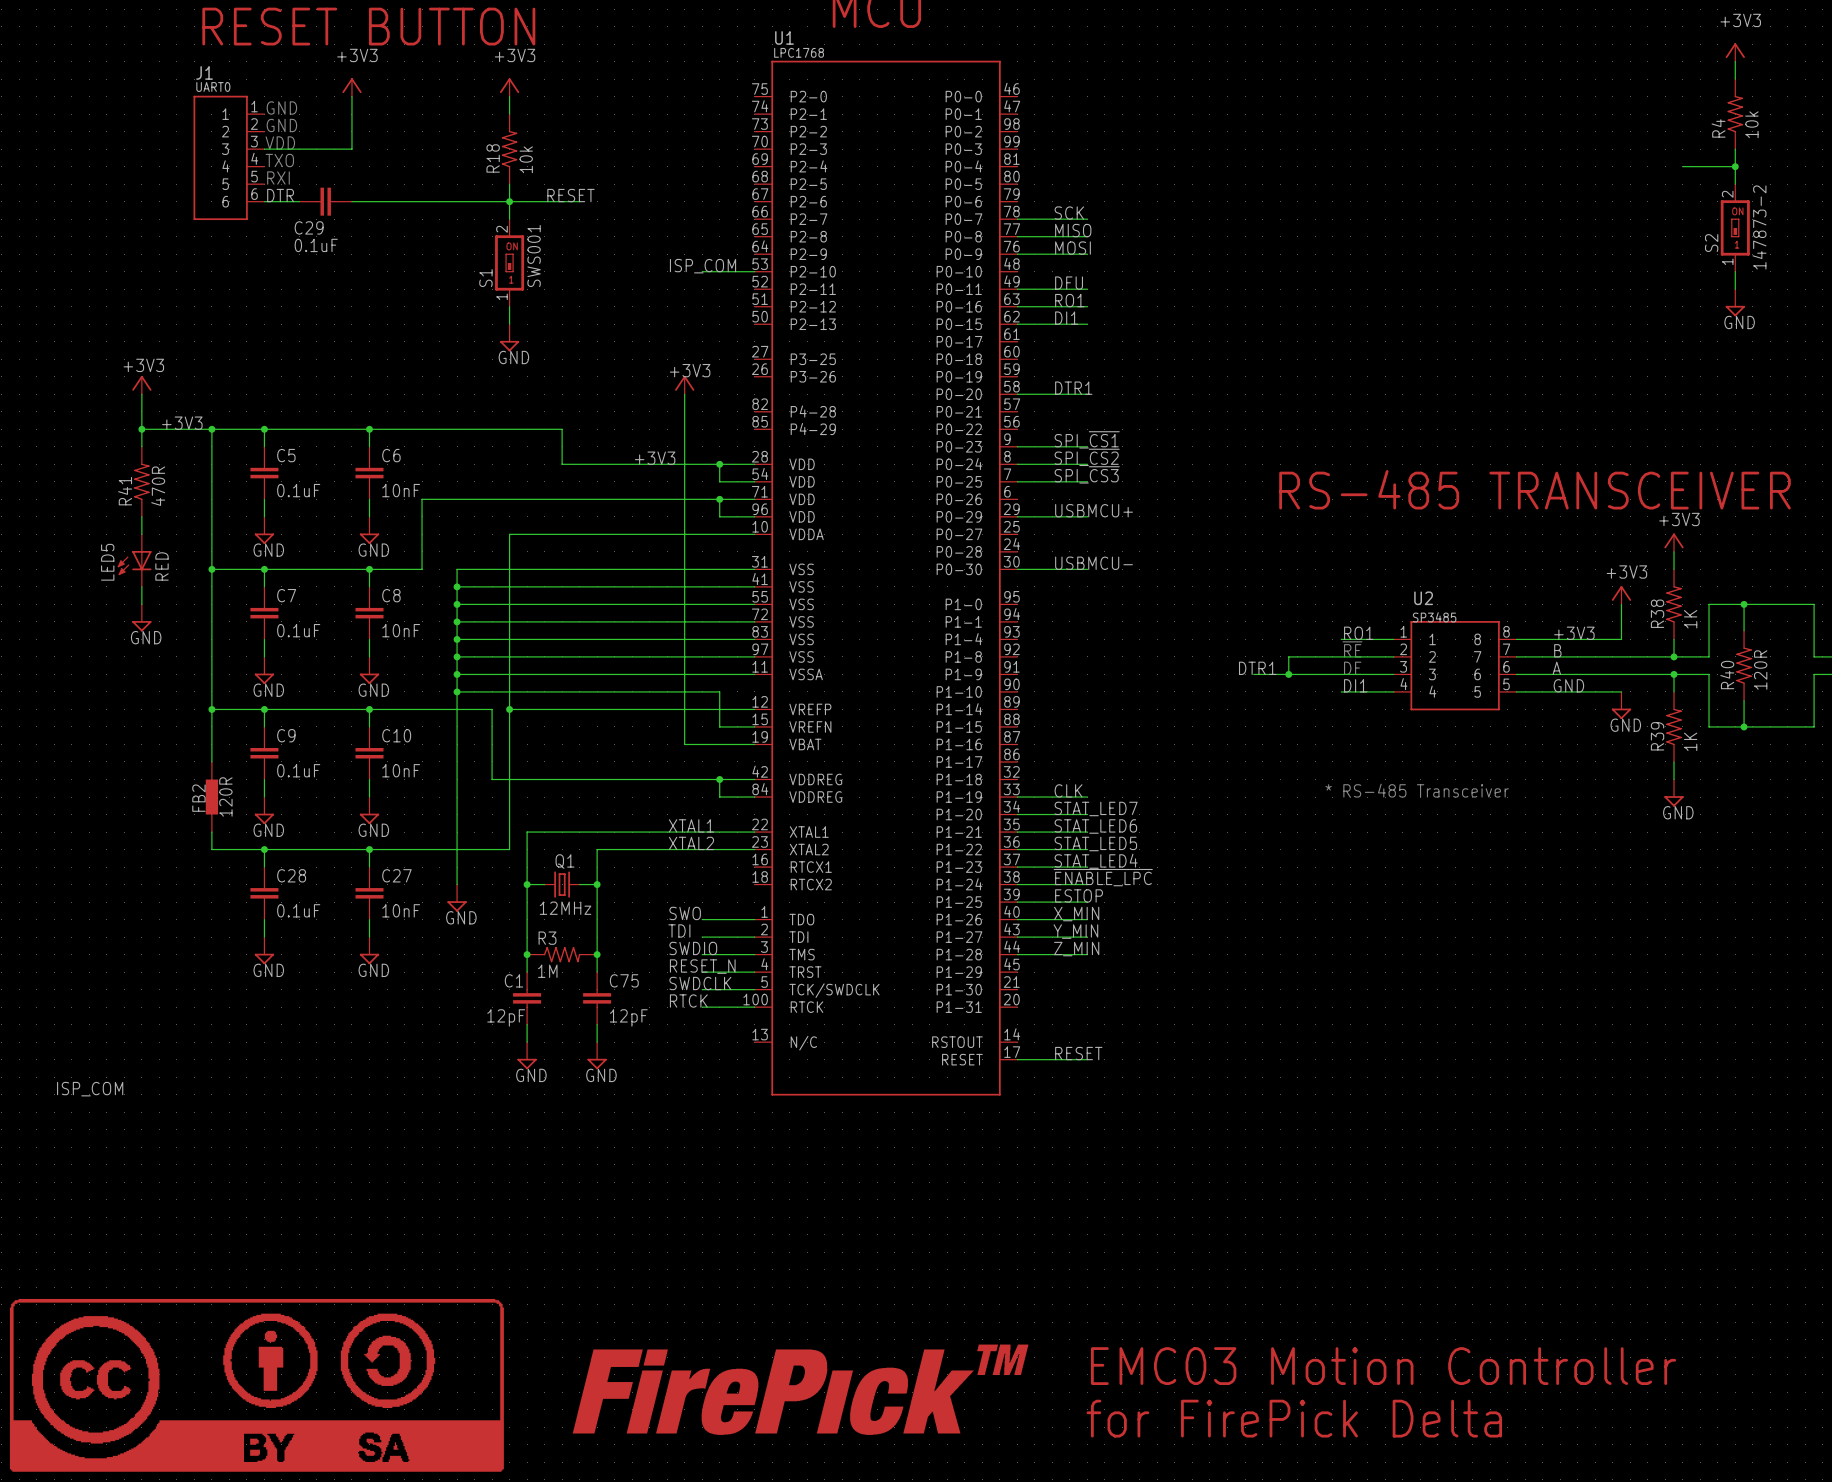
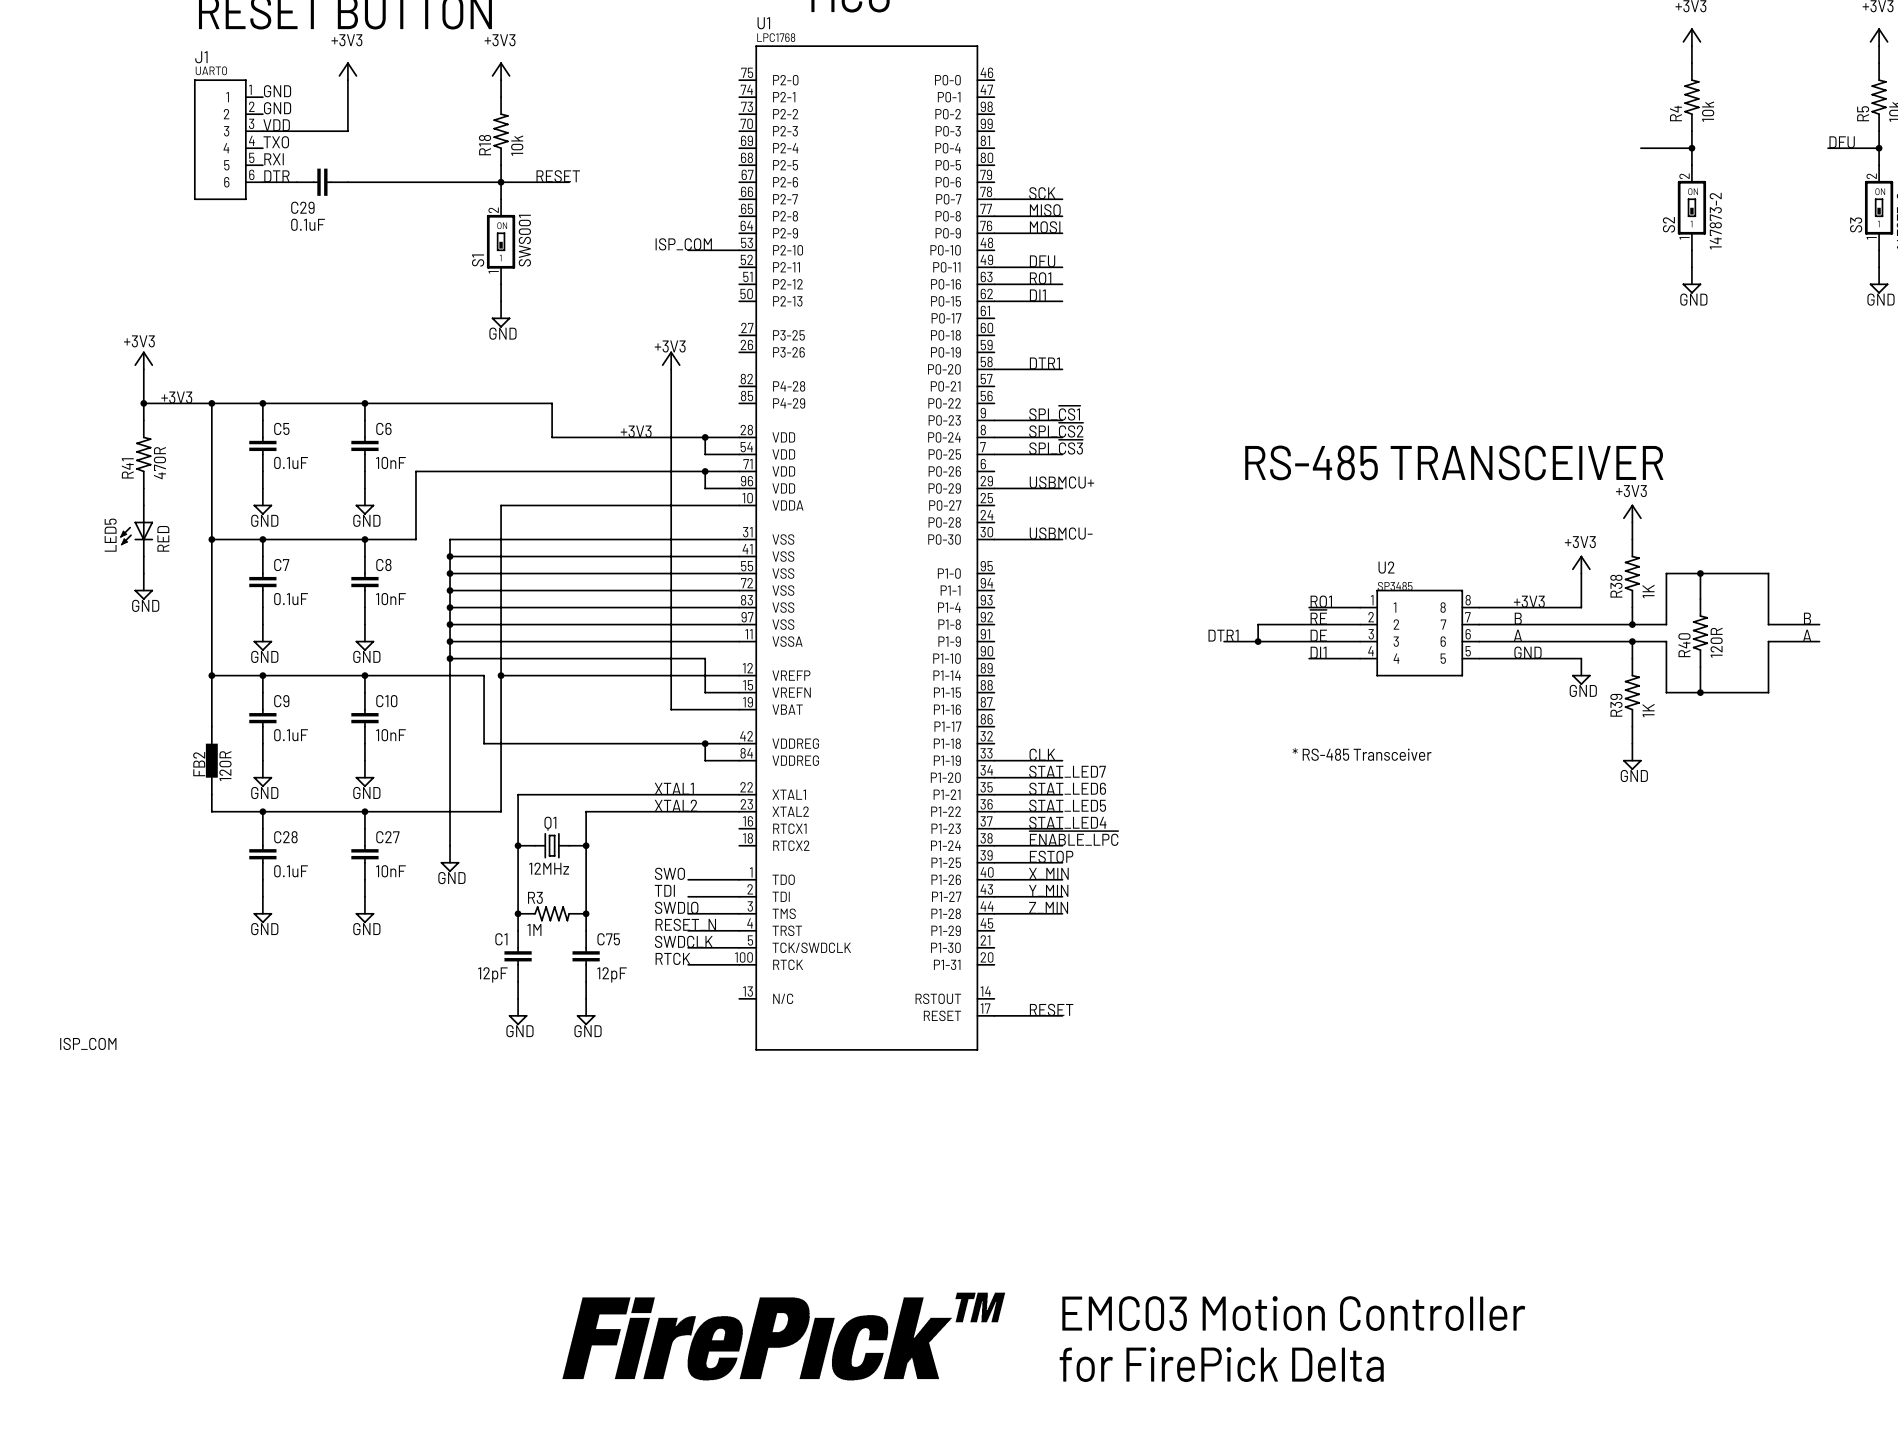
part: (256, 1385) -> none

